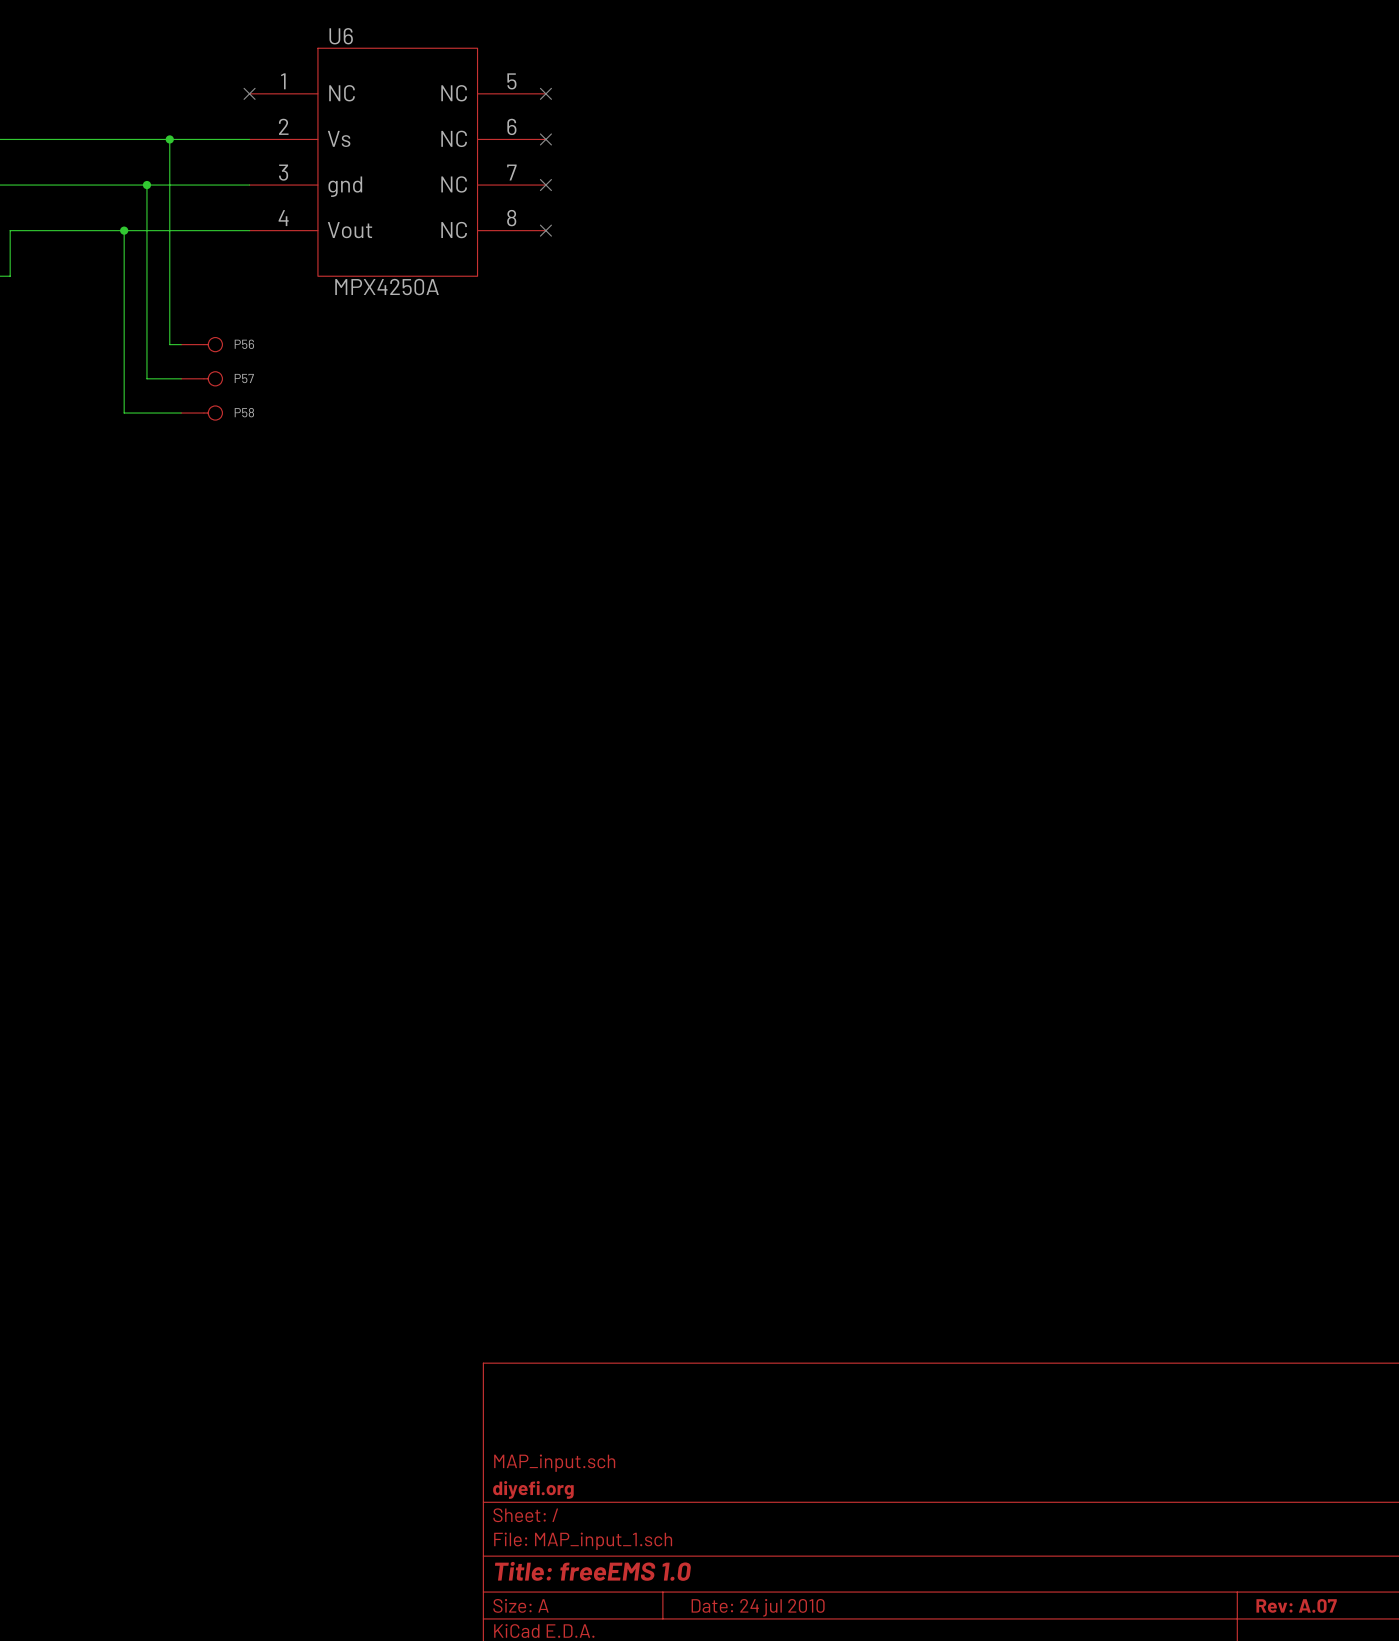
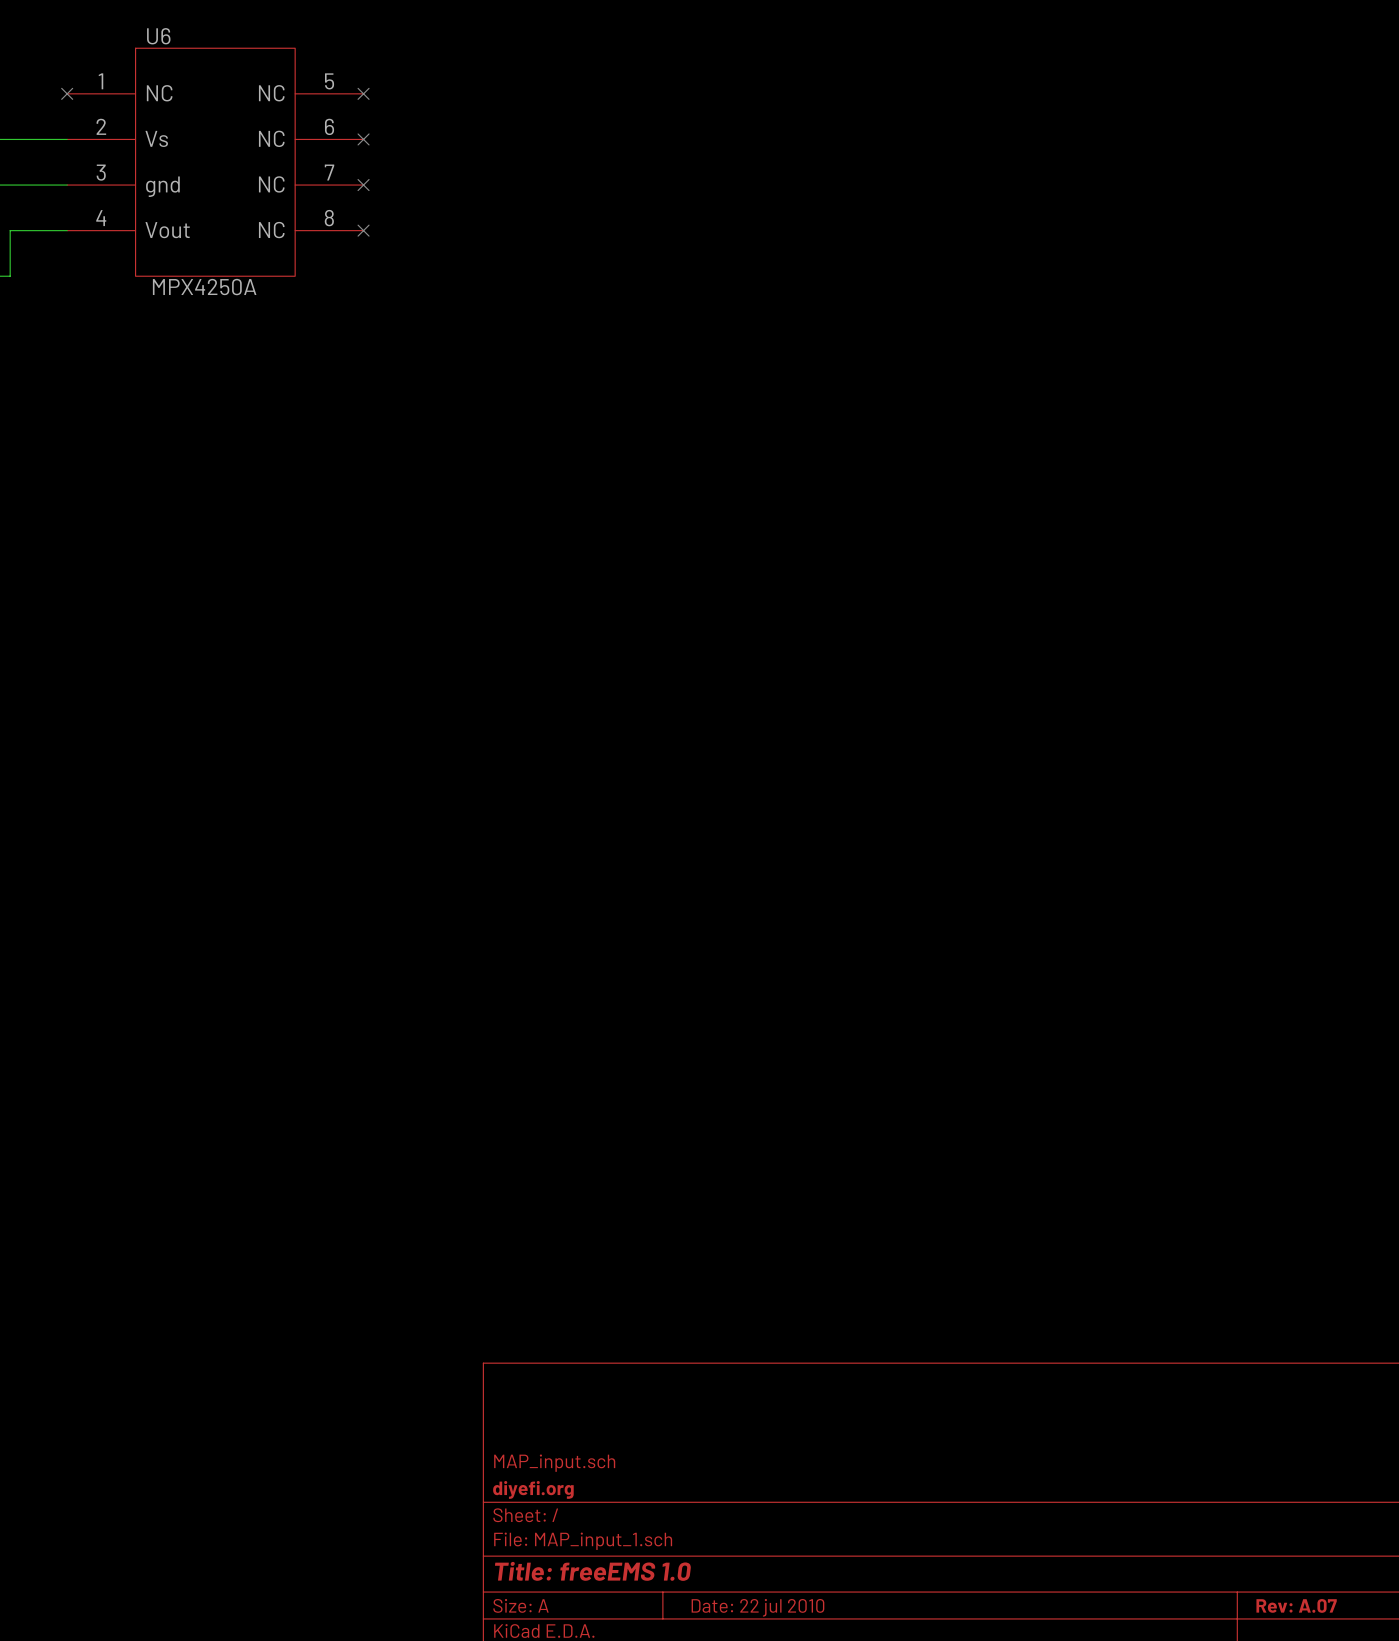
no-connect mark: none -> (67, 93)
no-connect mark: (249, 93) -> none
no-connect mark: none -> (363, 93)
no-connect mark: (545, 93) -> none
wire: (67, 139) (249, 139) -> none
wire: (169, 139) (169, 344) (181, 344) -> none
junction: (169, 139) -> none
no-connect mark: none -> (363, 139)
no-connect mark: (545, 139) -> none
U6 position: (397, 162) -> (215, 162)
wire: (67, 185) (249, 185) -> none
wire: (146, 185) (146, 378) (181, 378) -> none
junction: (146, 185) -> none
no-connect mark: none -> (363, 185)
no-connect mark: (545, 185) -> none
wire: (67, 230) (249, 230) -> none
wire: (124, 230) (124, 413) (181, 413) -> none
junction: (124, 230) -> none
no-connect mark: none -> (363, 230)
no-connect mark: (545, 230) -> none
P56: (201, 344) -> none
P57: (201, 378) -> none
P58: (201, 413) -> none
title block: Date: 24 jul 2010 (758, 1607) -> Date: 22 jul 2010 (757, 1607)

